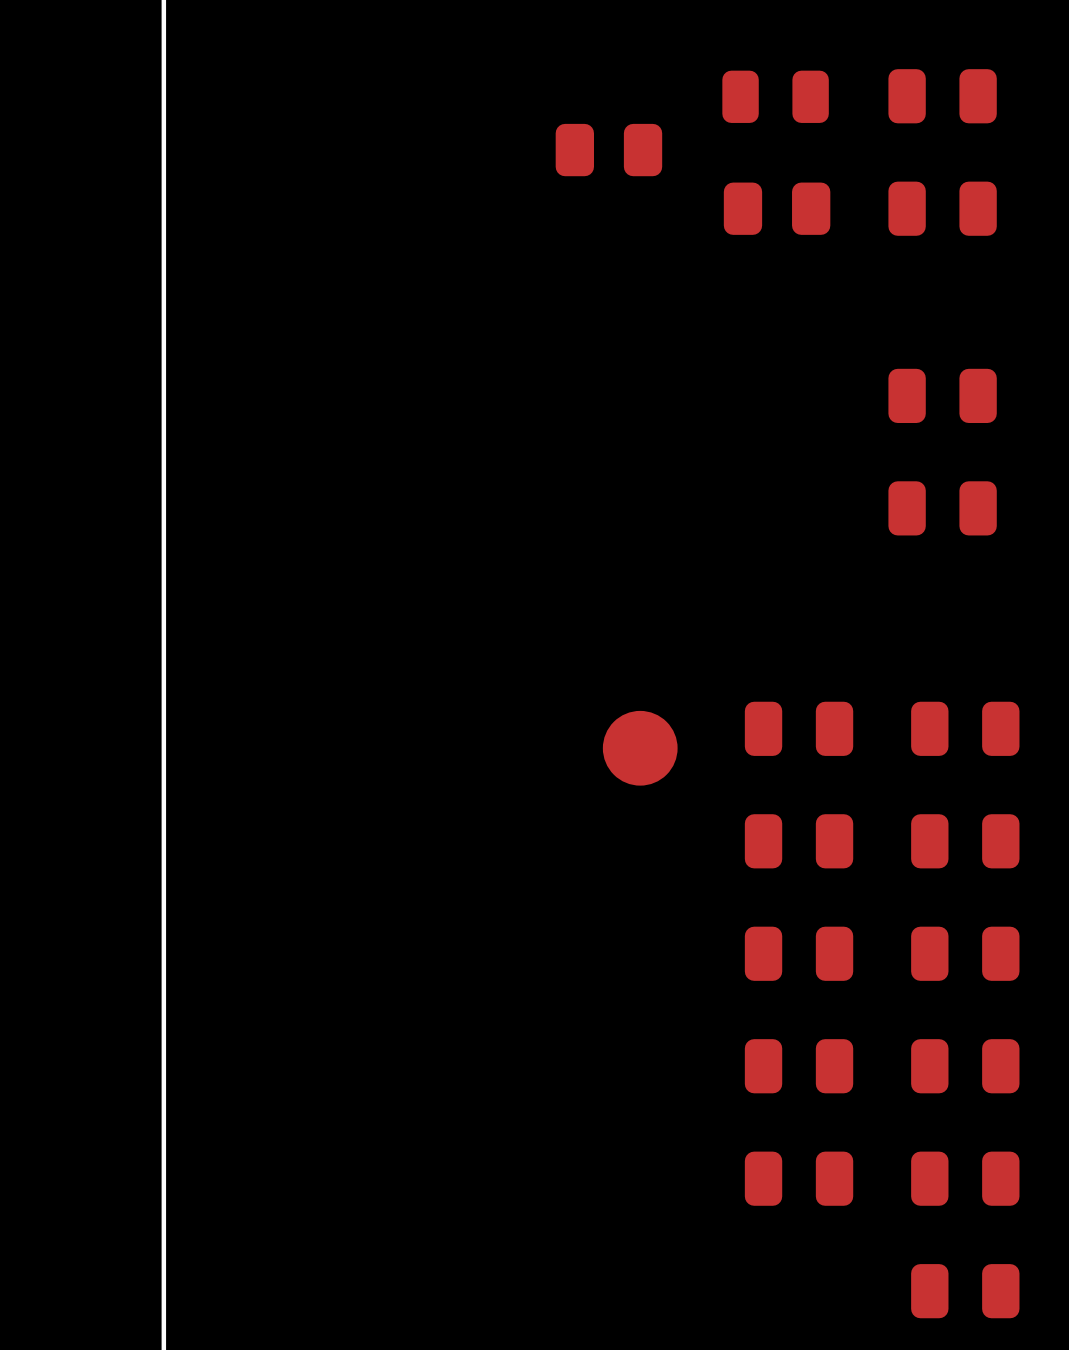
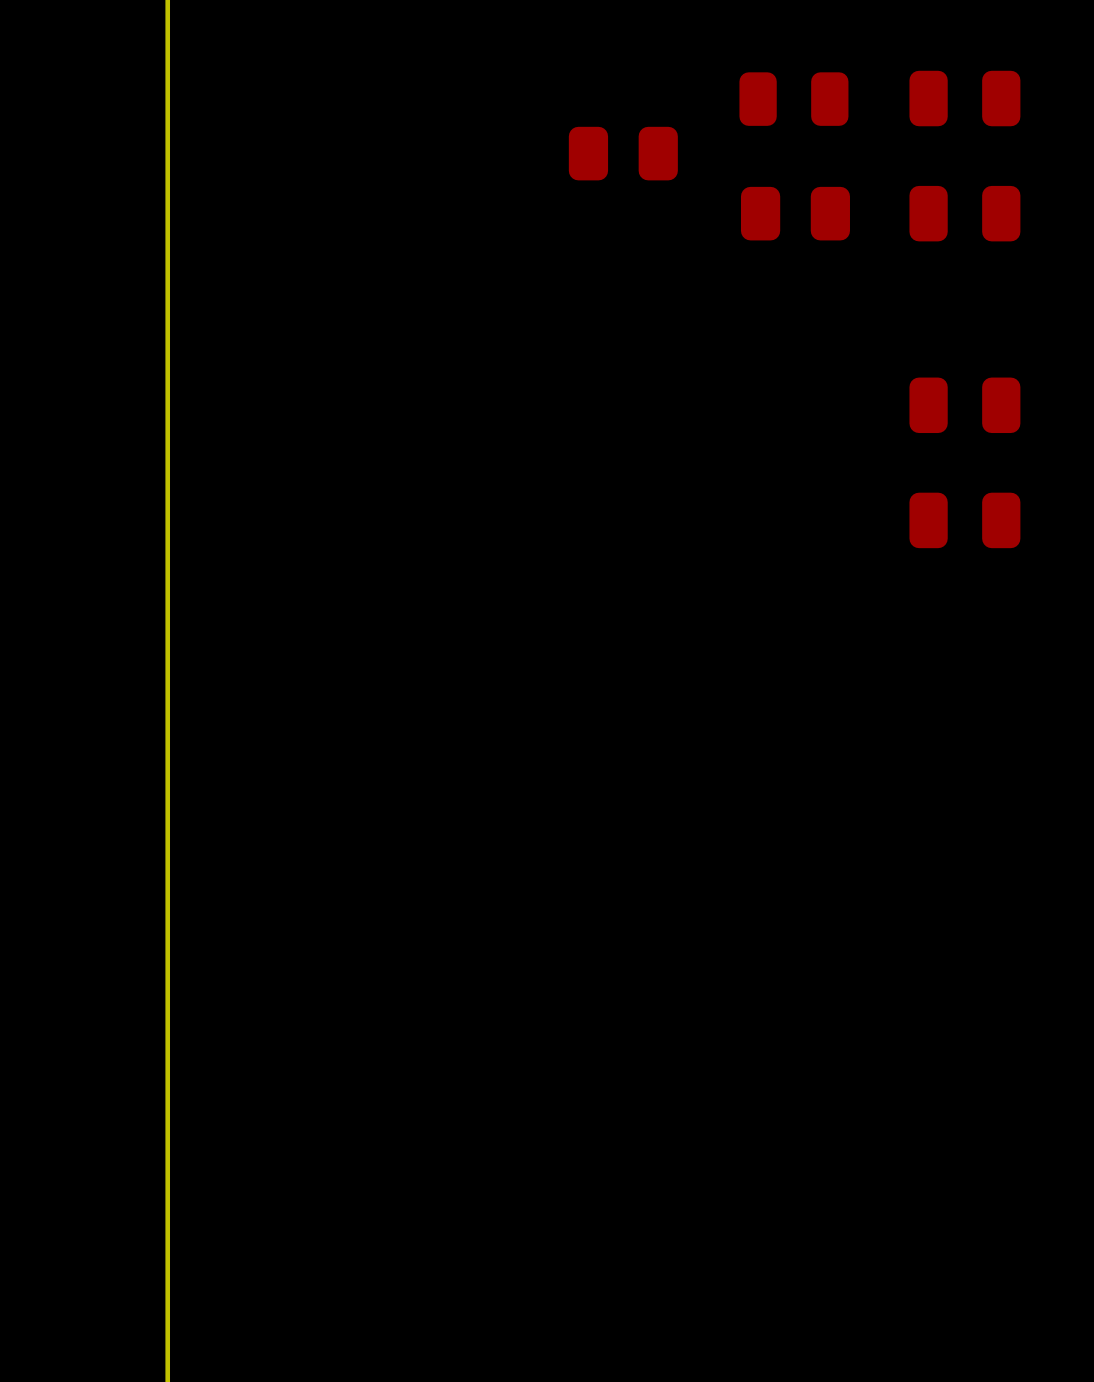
part: (799, 728) -> none
part: (965, 728) -> none
part: (640, 748) -> none
part: (799, 841) -> none
part: (965, 841) -> none
part: (799, 953) -> none
part: (965, 953) -> none
part: (799, 1066) -> none
part: (965, 1066) -> none
part: (799, 1178) -> none
part: (965, 1178) -> none
part: (965, 1291) -> none

